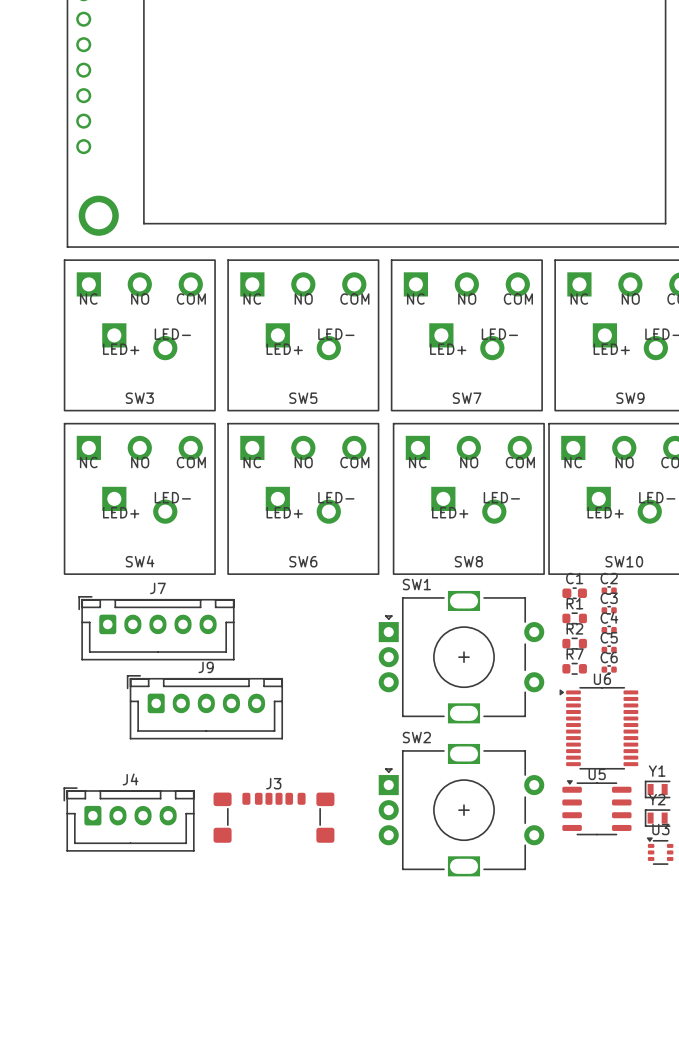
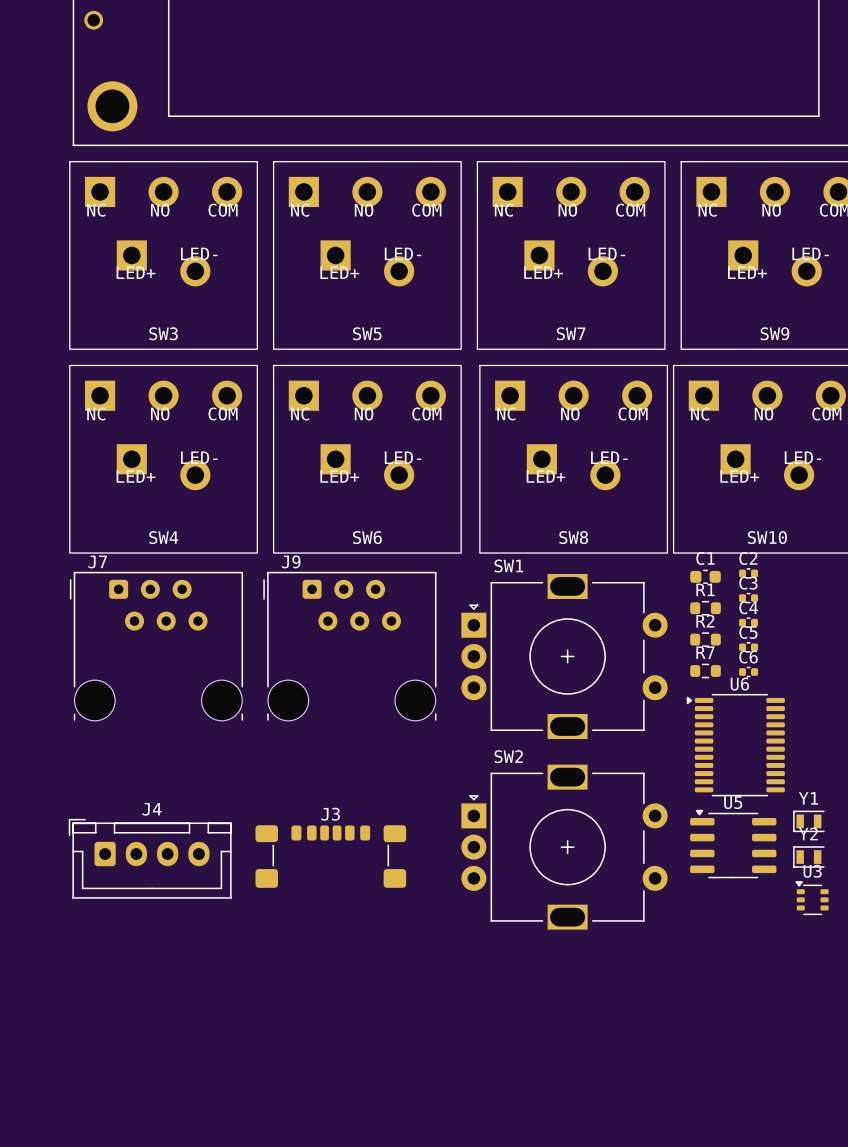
J7 name position: J7 (157, 588) -> J7 (97, 561)
J7 footprint: [78, 596, 235, 661] -> [69, 571, 244, 721]
J9 name position: J9 (206, 667) -> J9 (291, 561)
J9 footprint: [127, 675, 283, 740] -> [263, 571, 437, 721]

